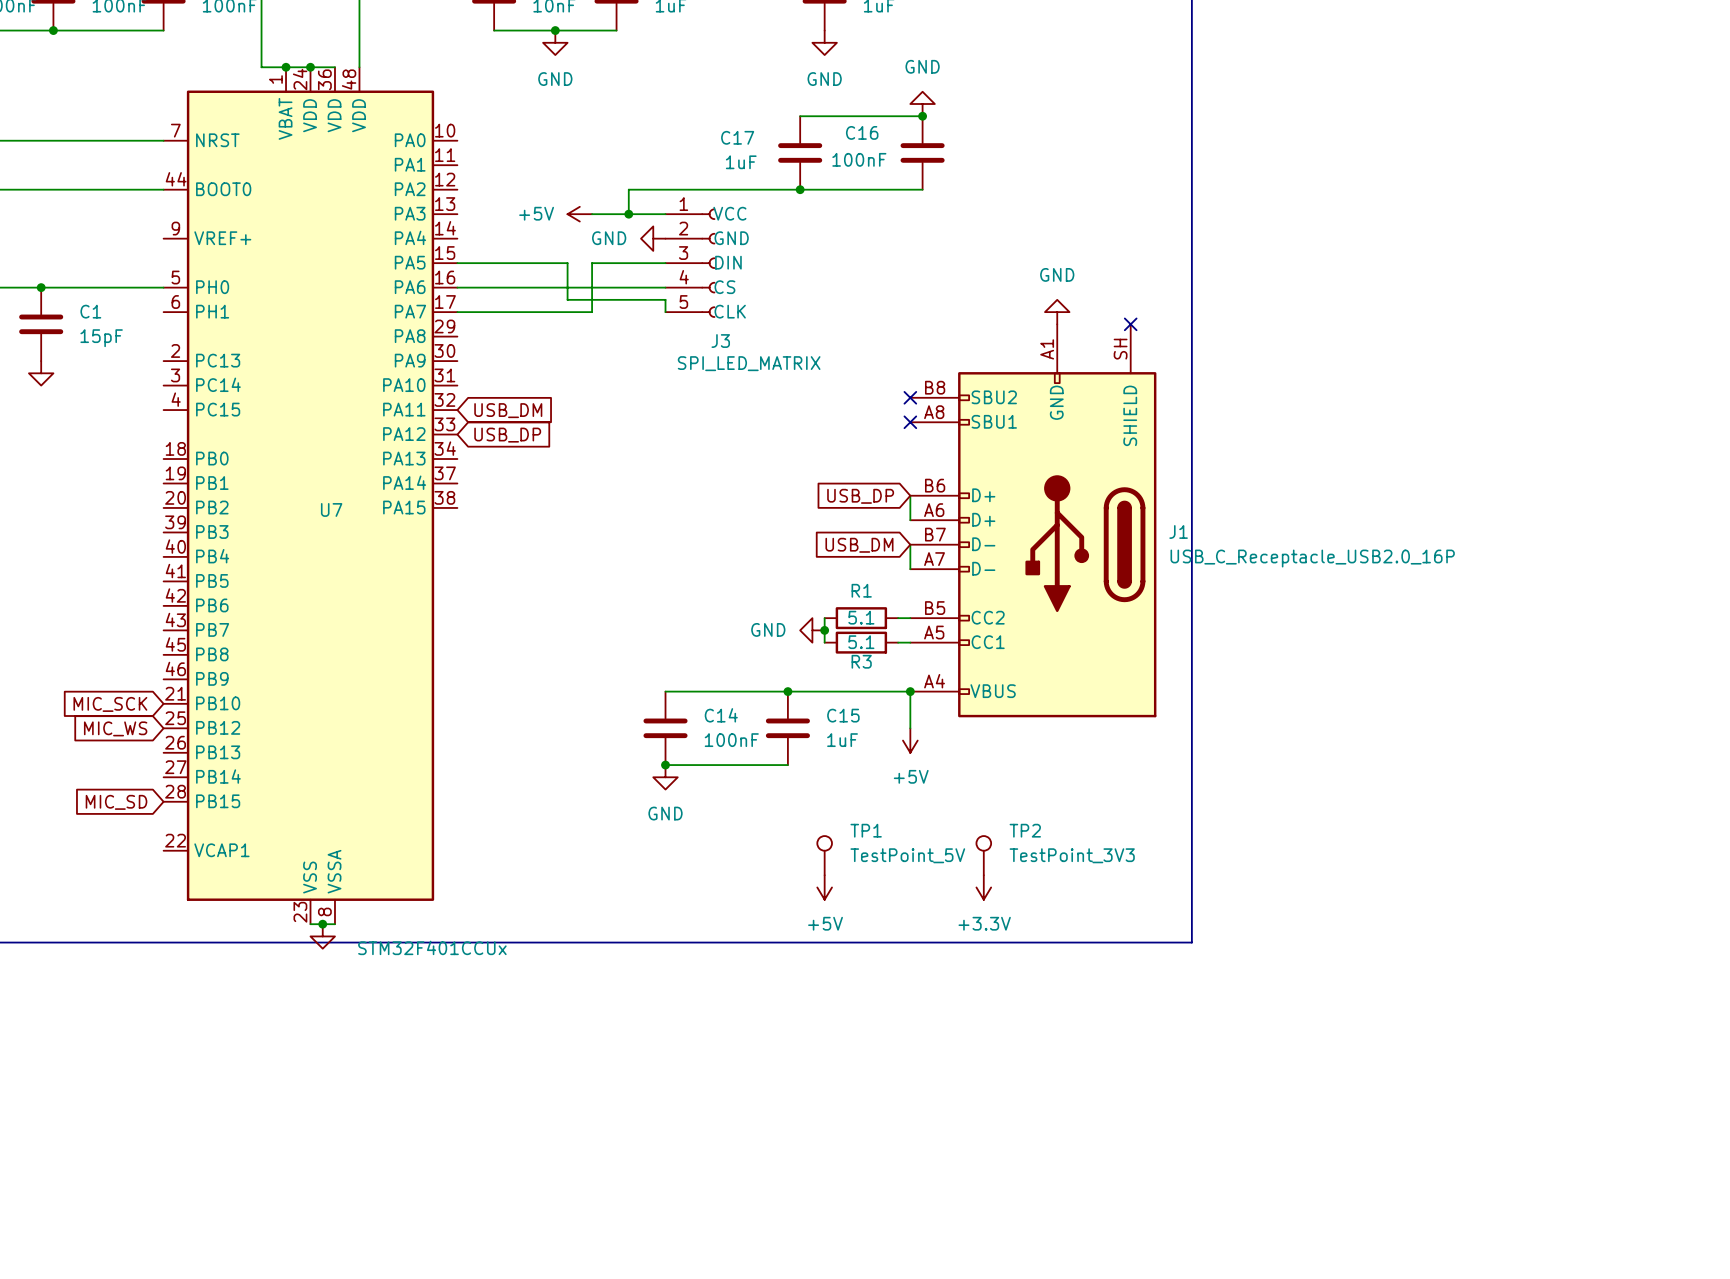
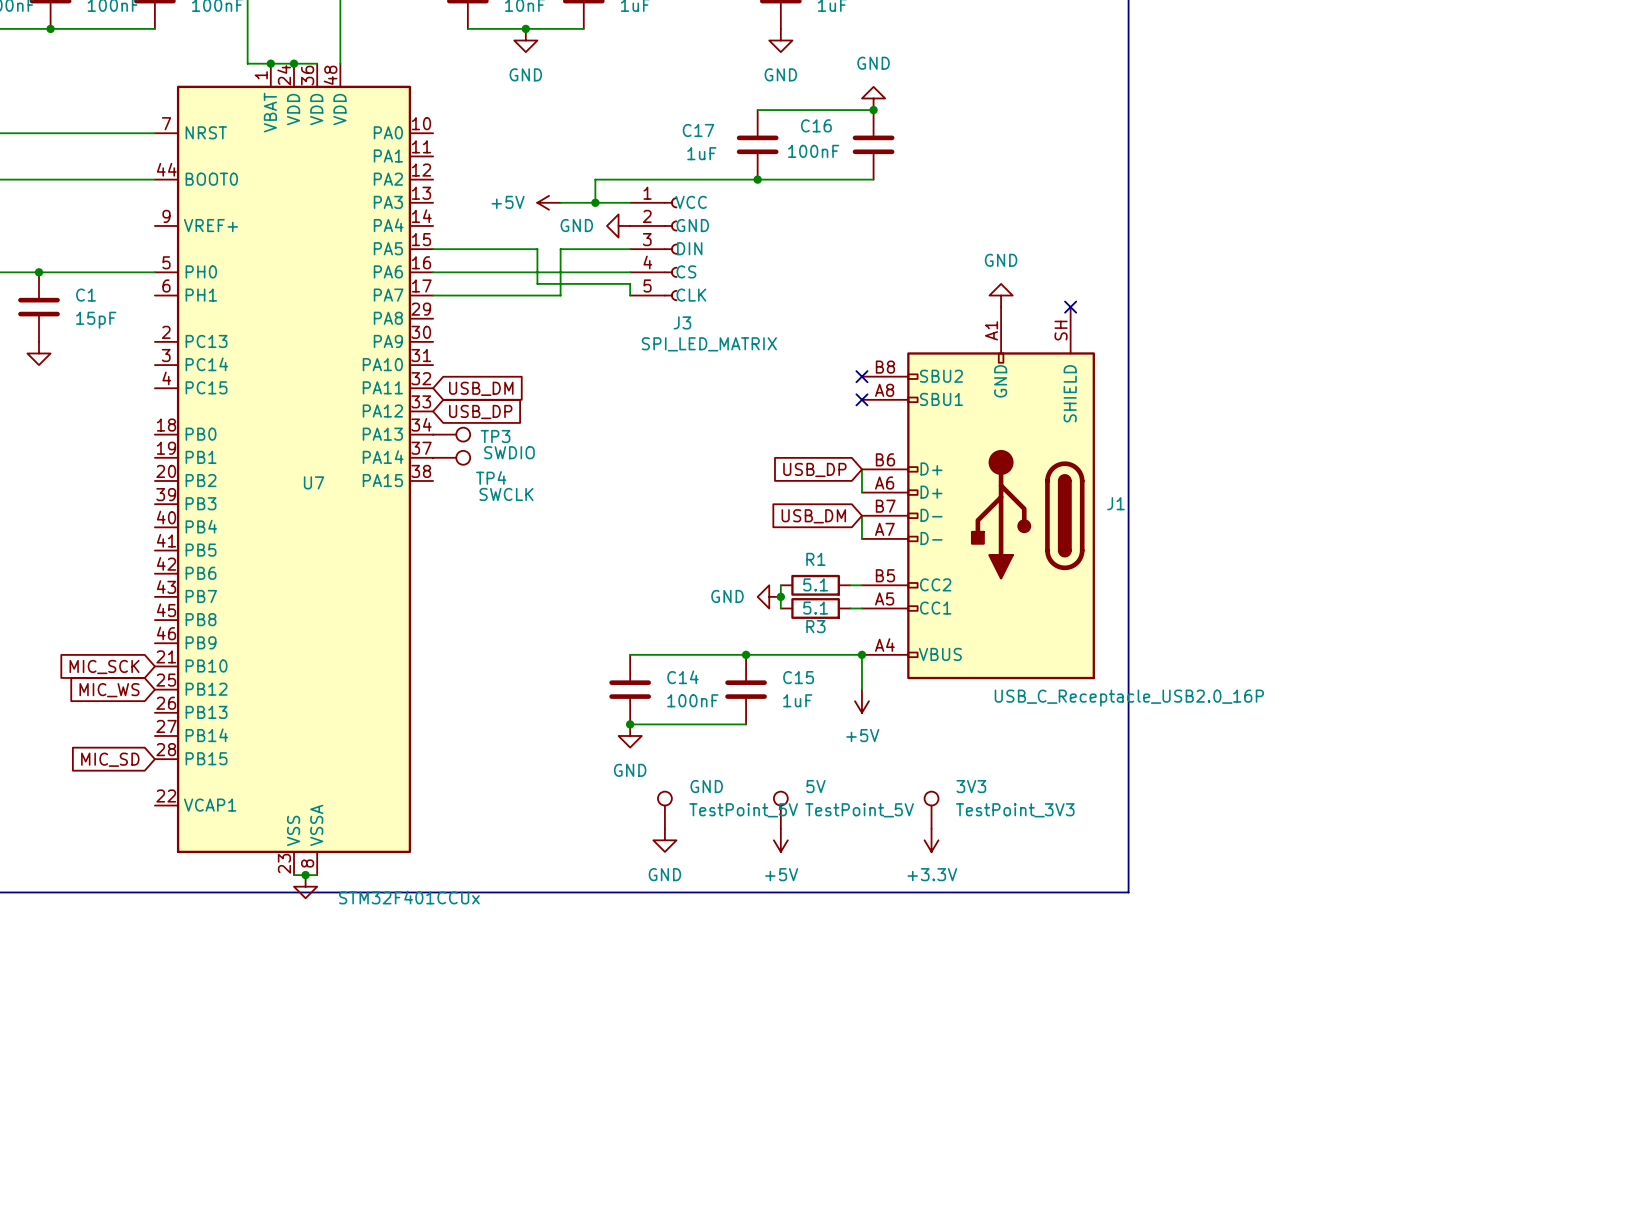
TP3: none -> SWDIO (451, 434)
TP4: none -> SWCLK (451, 457)
J1 value position: USB_C_Receptacle_USB2.0_16P (1312, 558) -> USB_C_Receptacle_USB2.0_16P (1129, 698)
TP1 name: TP1 (866, 830) -> 5V (815, 786)
TP2 name: TP2 (1025, 830) -> 3V3 (971, 786)
GND: none -> TestPoint_5V (664, 810)
power symbol: none -> GND (664, 840)

